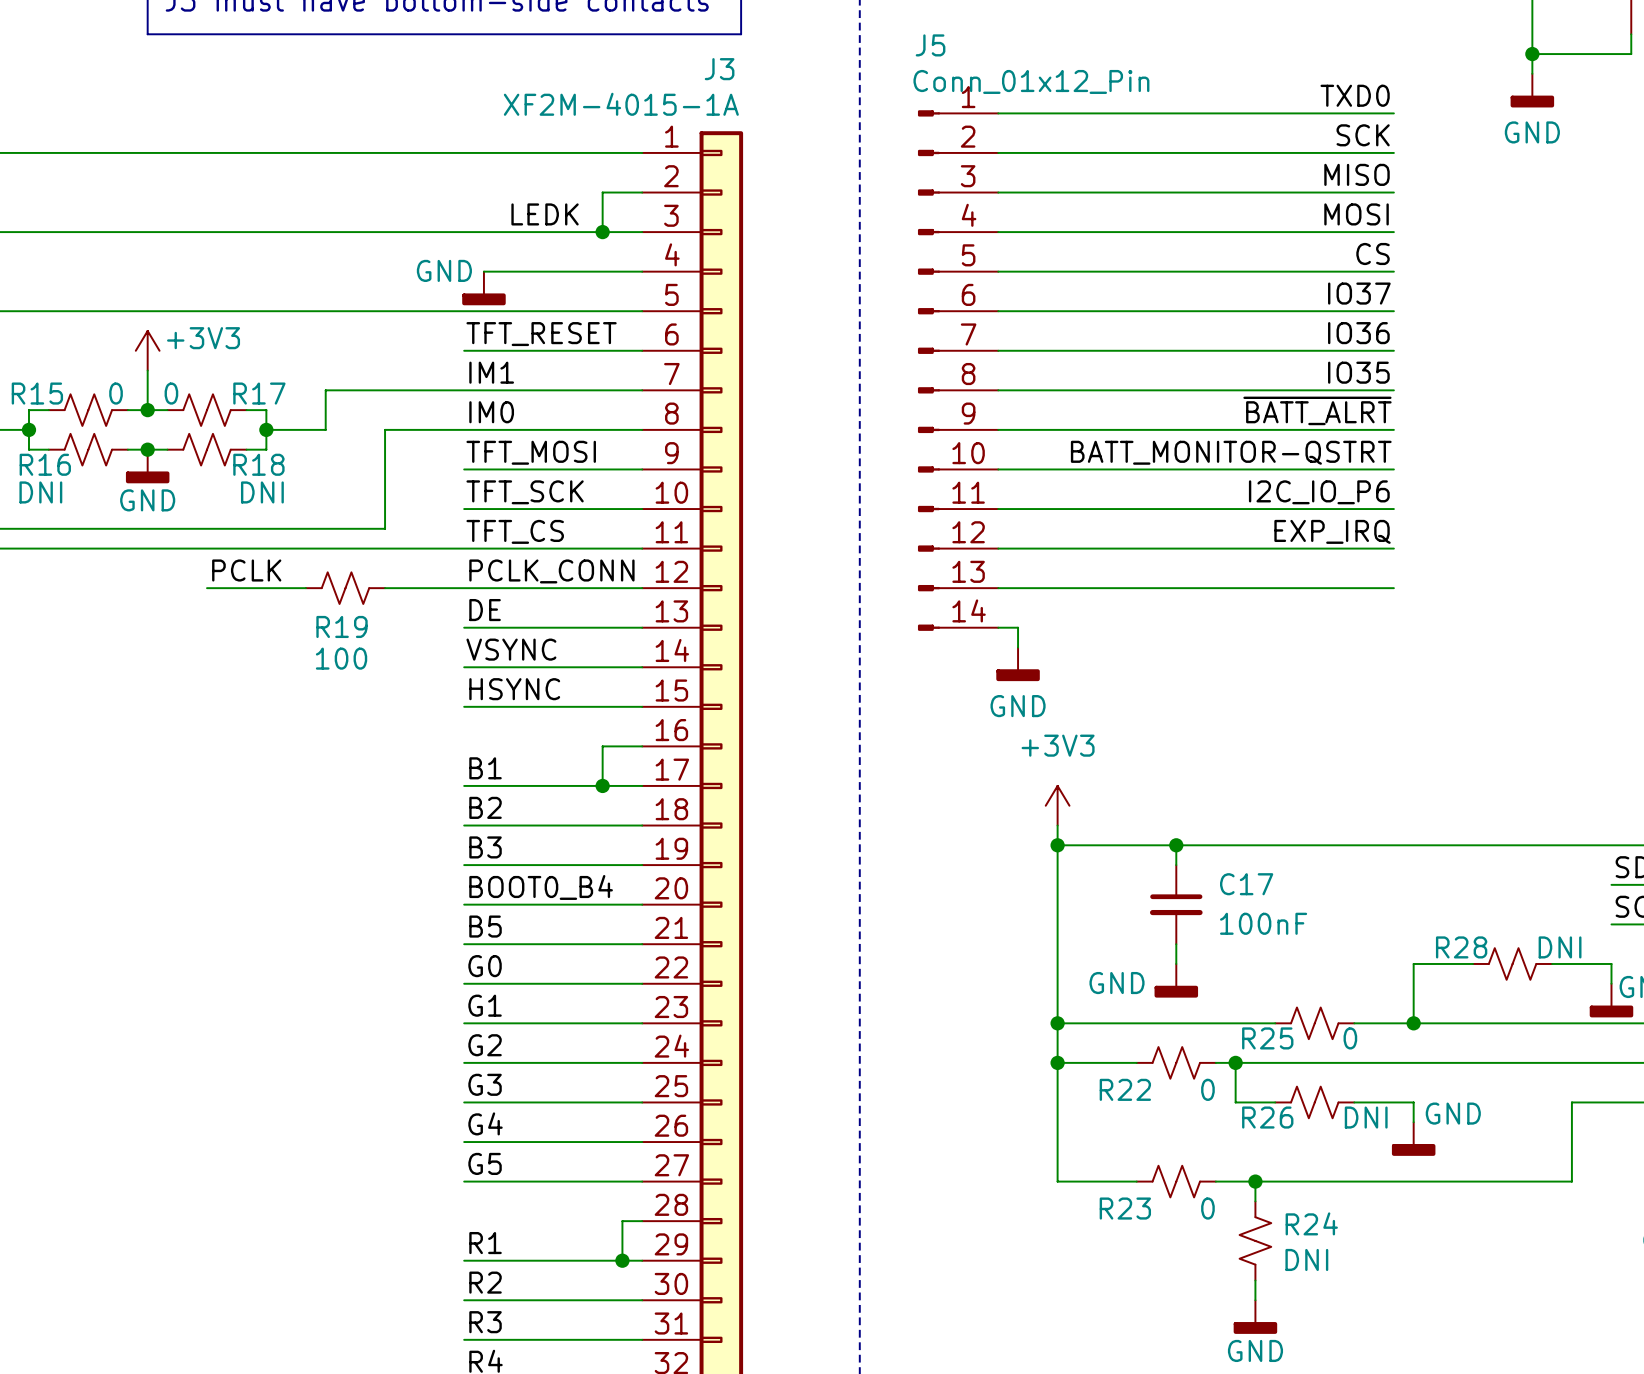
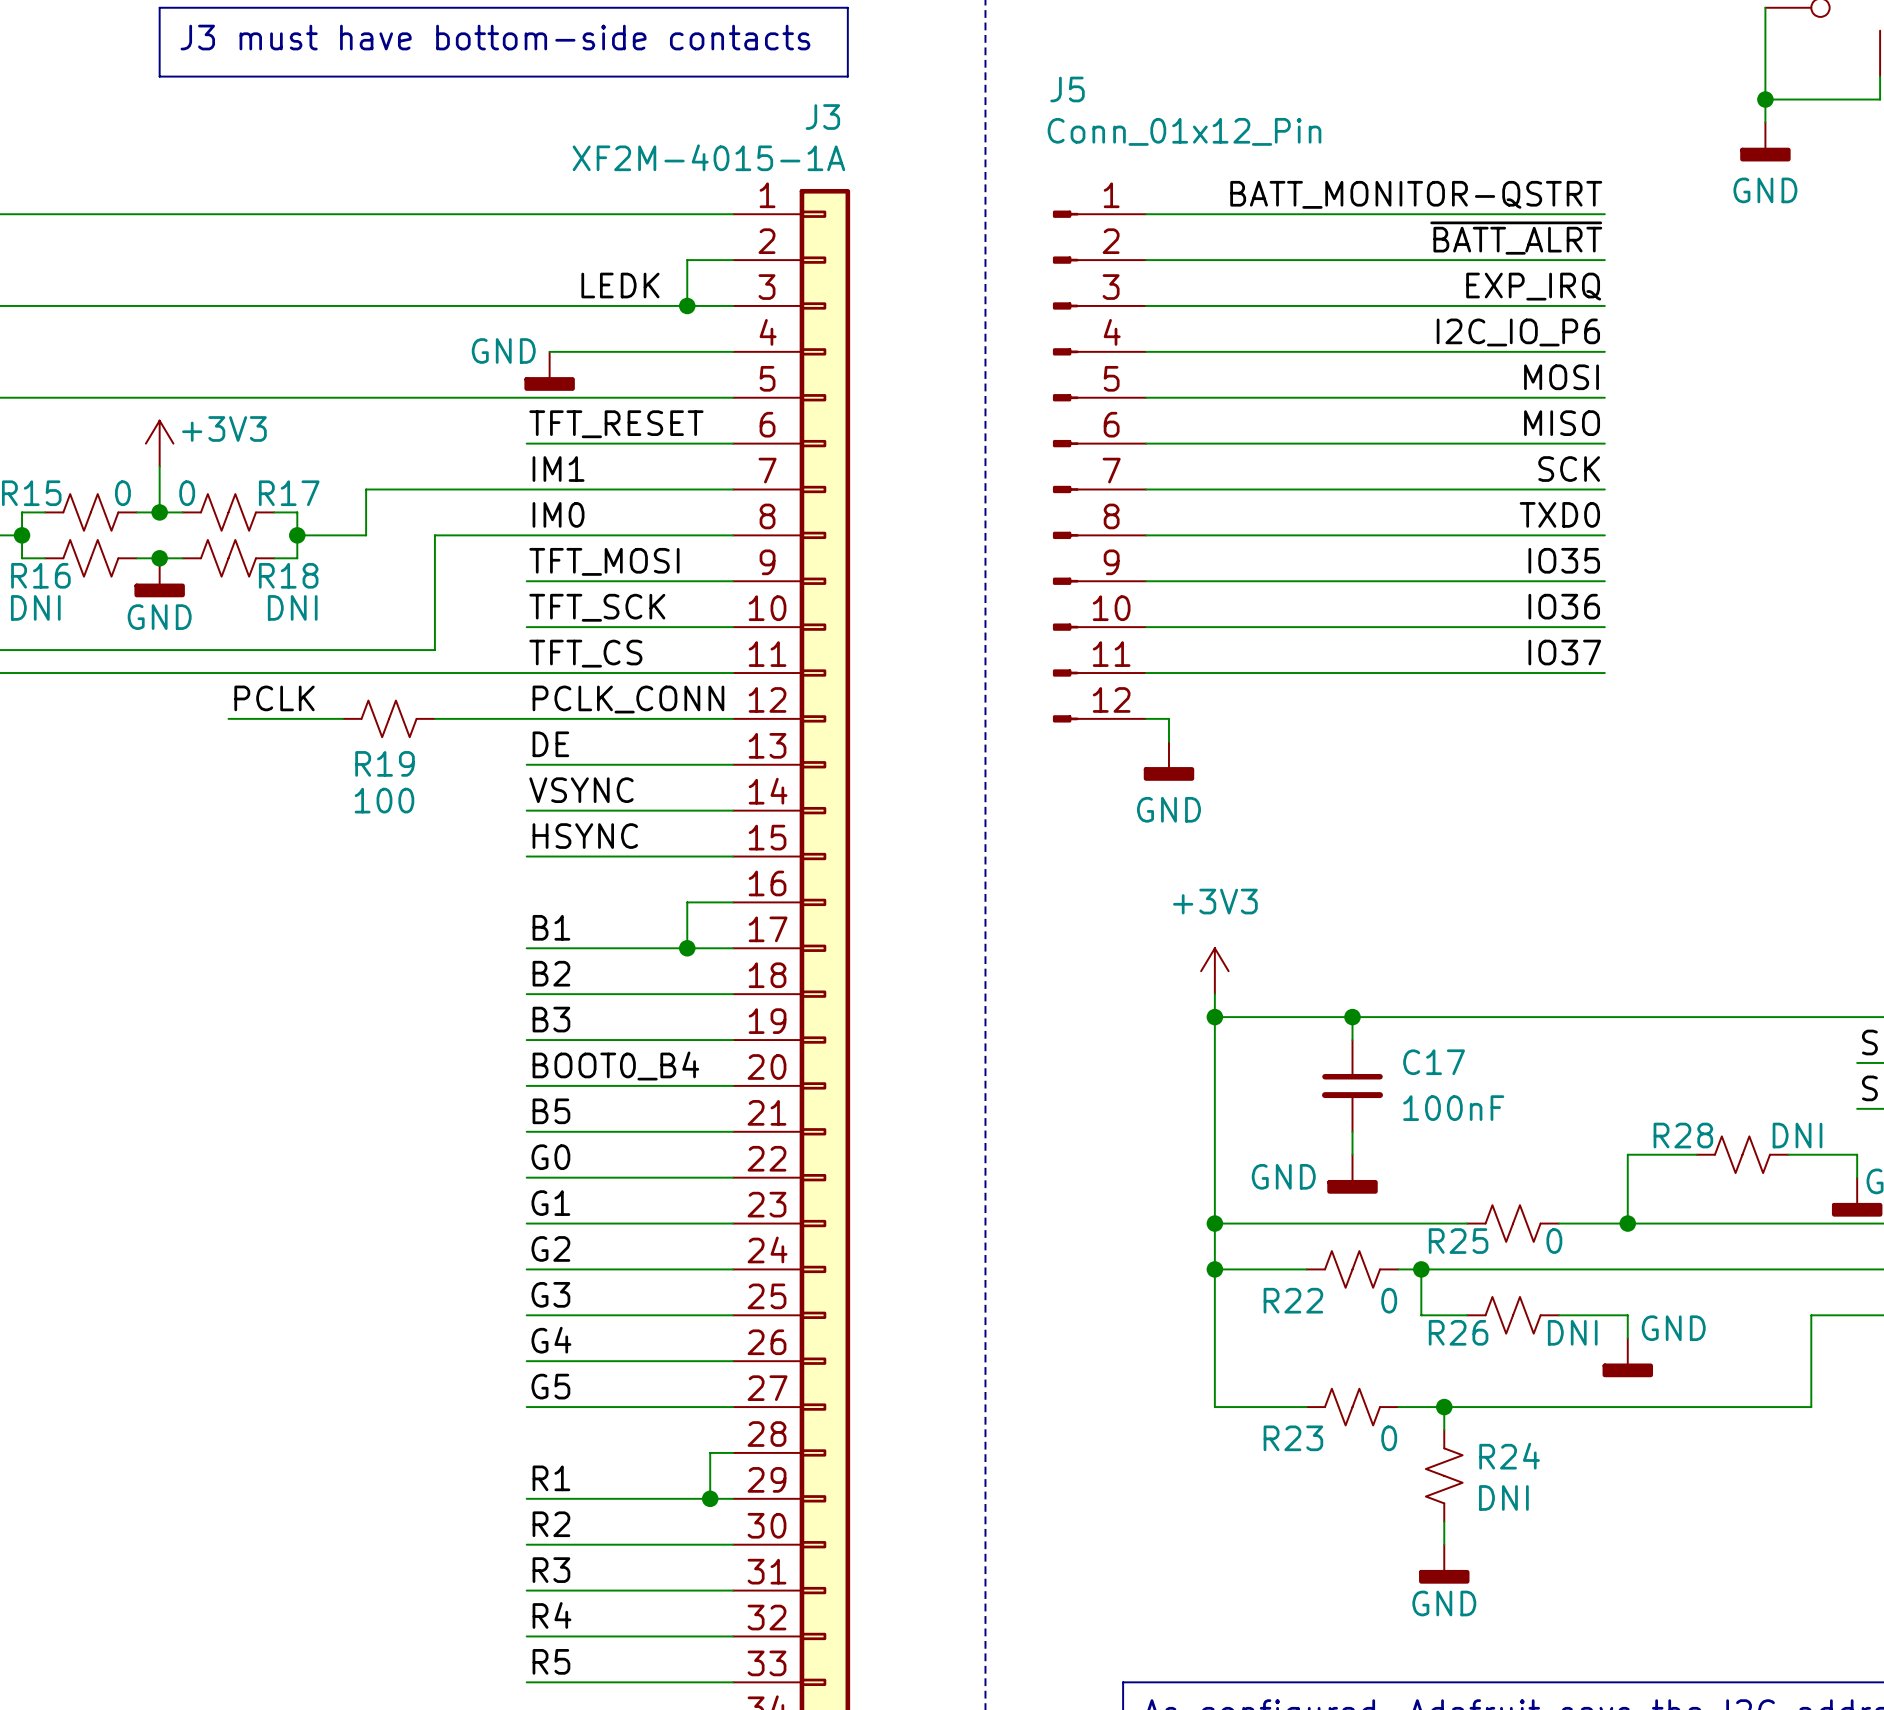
label: TXD0 (1355, 95) -> none
J5 symbol: [917, 110, 999, 631] -> [1052, 210, 1147, 723]
wire: (998, 113) (1393, 113) -> none
label: SCK (1363, 135) -> BATT_MONITOR-QSTRT (1416, 194)
label: MISO (1357, 174) -> ~{BATT_ALRT} (1516, 238)
label: MOSI (1356, 214) -> EXP_IRQ (1533, 286)
label: CS (1373, 254) -> I2C_IO_P6 (1518, 332)
label: IO37 (1359, 293) -> MOSI (1561, 377)
label: IO36 (1358, 333) -> MISO (1562, 423)
label: IO35 (1358, 372) -> SCK (1569, 469)
label: ~{BATT_ALRT} (1317, 410) -> TXD0 (1559, 514)
label: BATT_MONITOR-QSTRT (1231, 452) -> IO35 (1564, 560)
label: I2C_IO_P6 (1319, 492) -> IO36 (1564, 606)
label: EXP_IRQ (1332, 531) -> IO37 (1564, 652)
wire: (1018, 588) (1393, 588) -> (1168, 718) (1168, 741)
wire: (998, 627) (1018, 627) (1018, 647) -> none
power symbol position: GND (1018, 664) -> GND (1168, 761)

